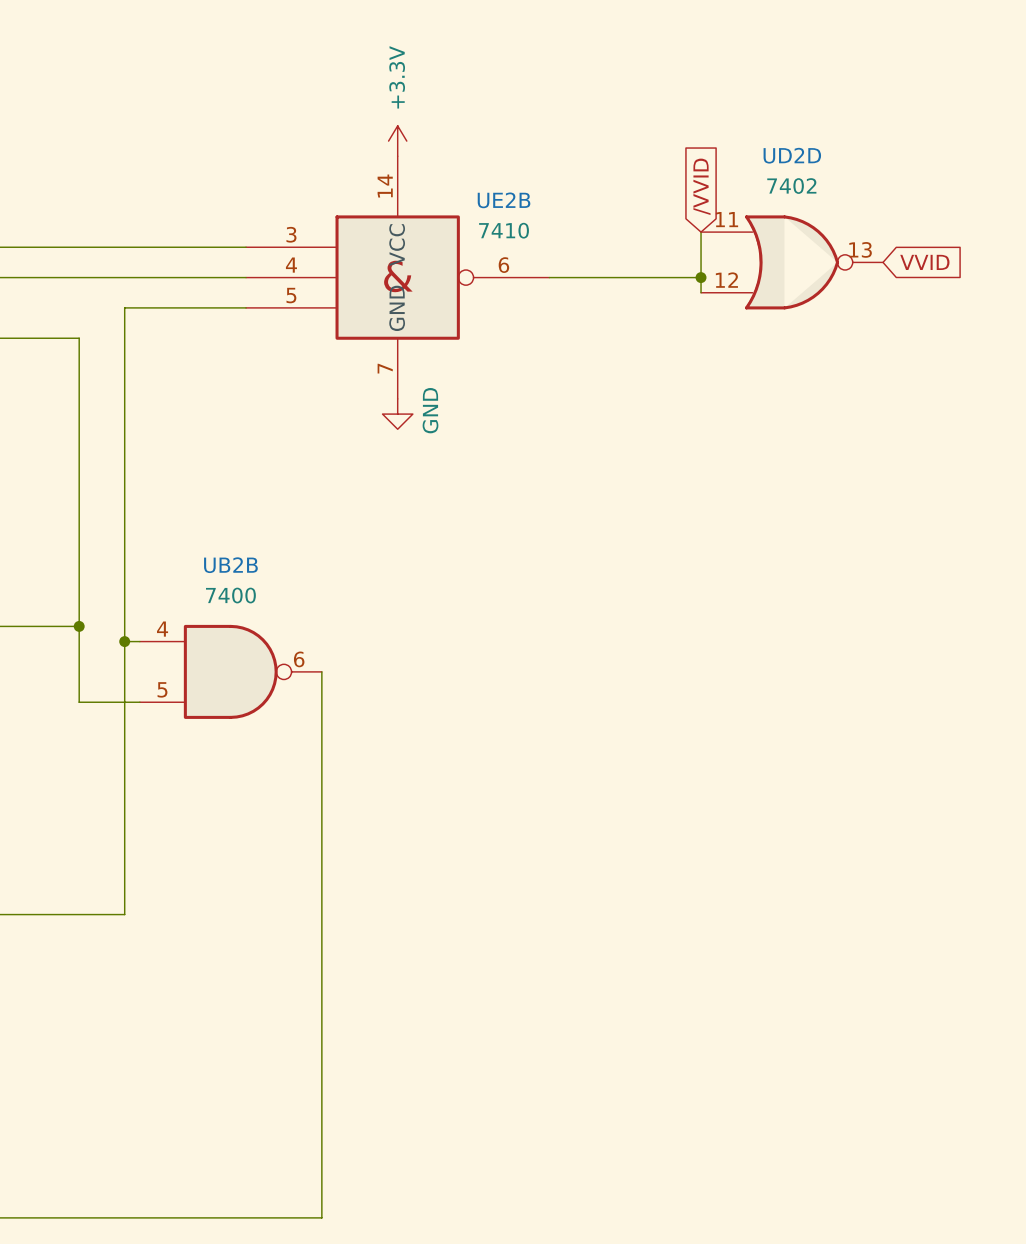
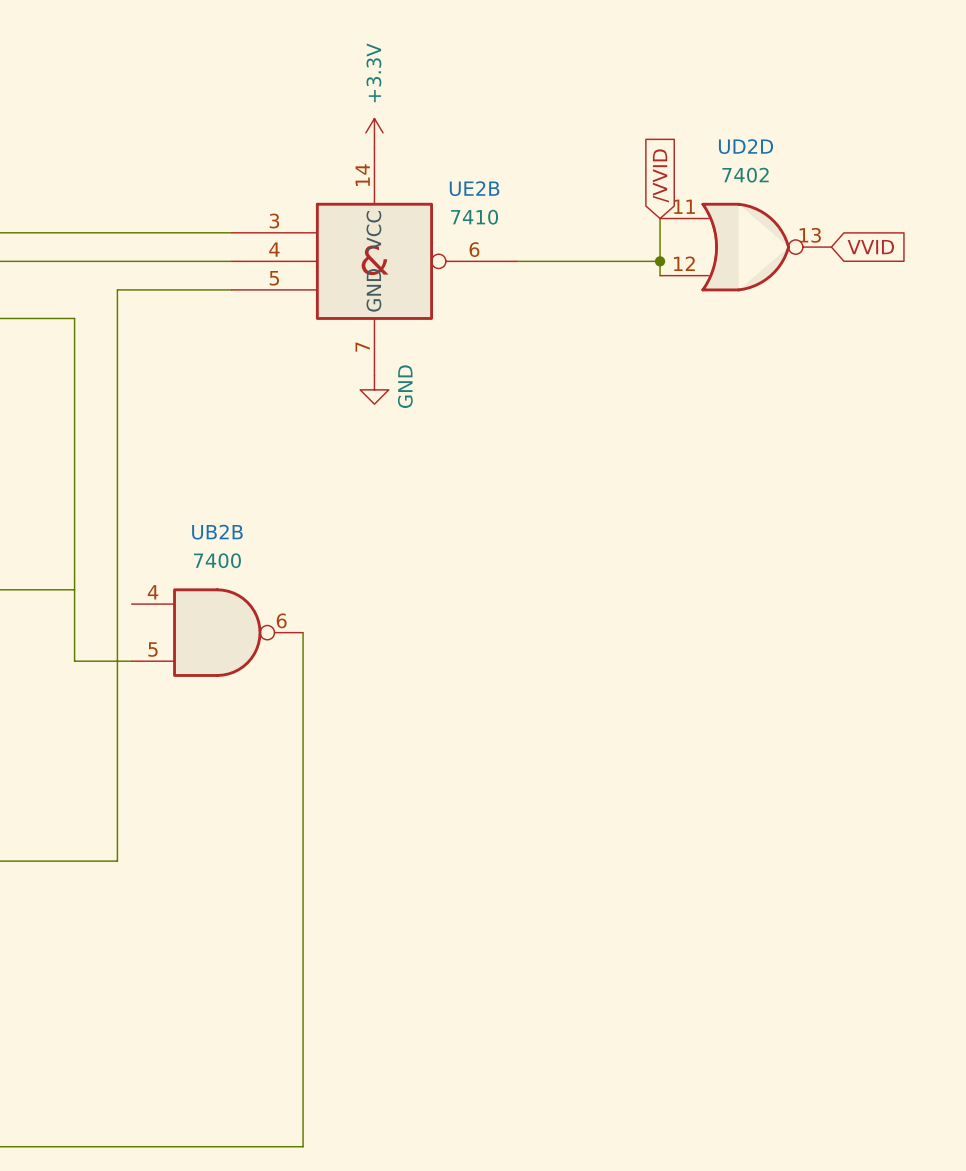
junction: (79, 626) -> none
wire: (124, 641) (139, 641) -> none
junction: (124, 641) -> none

